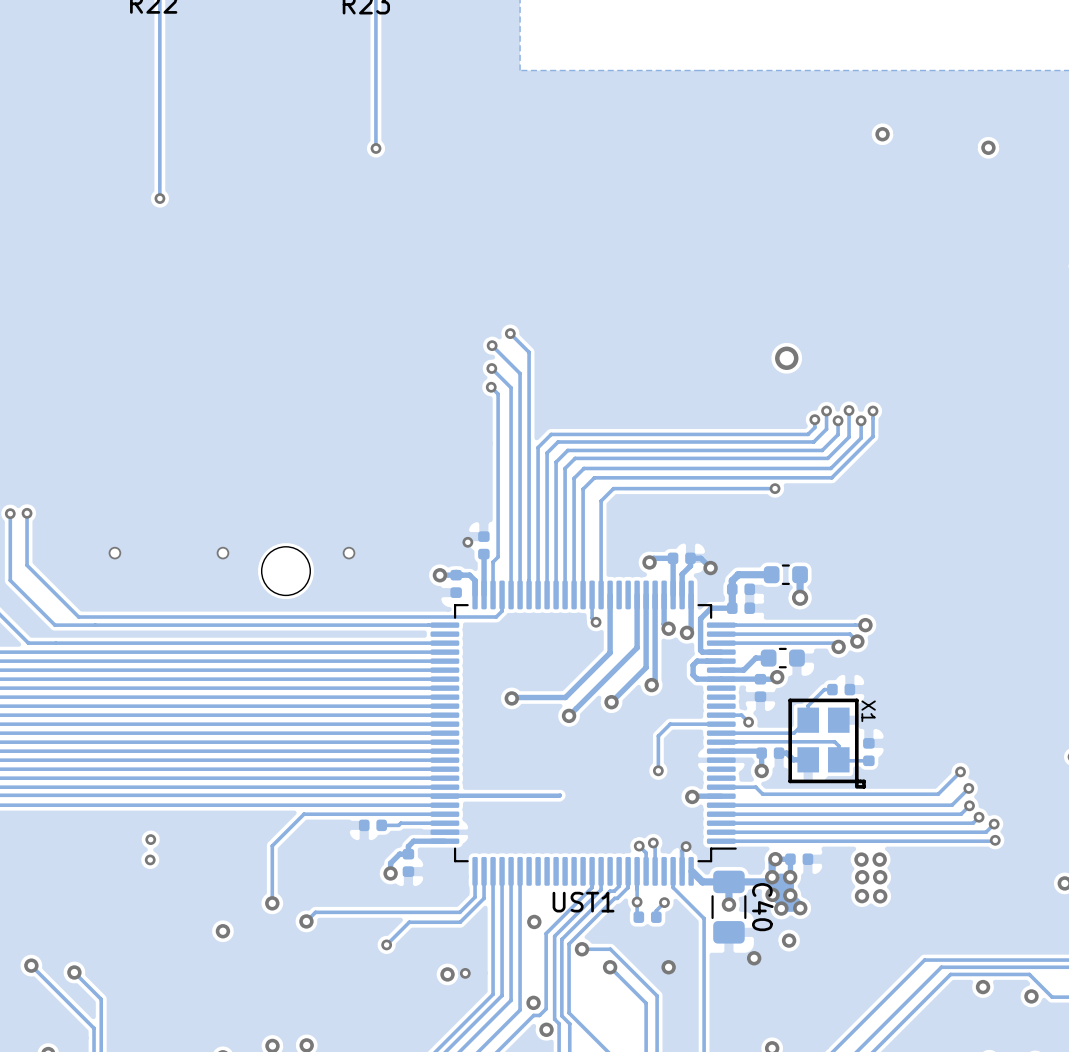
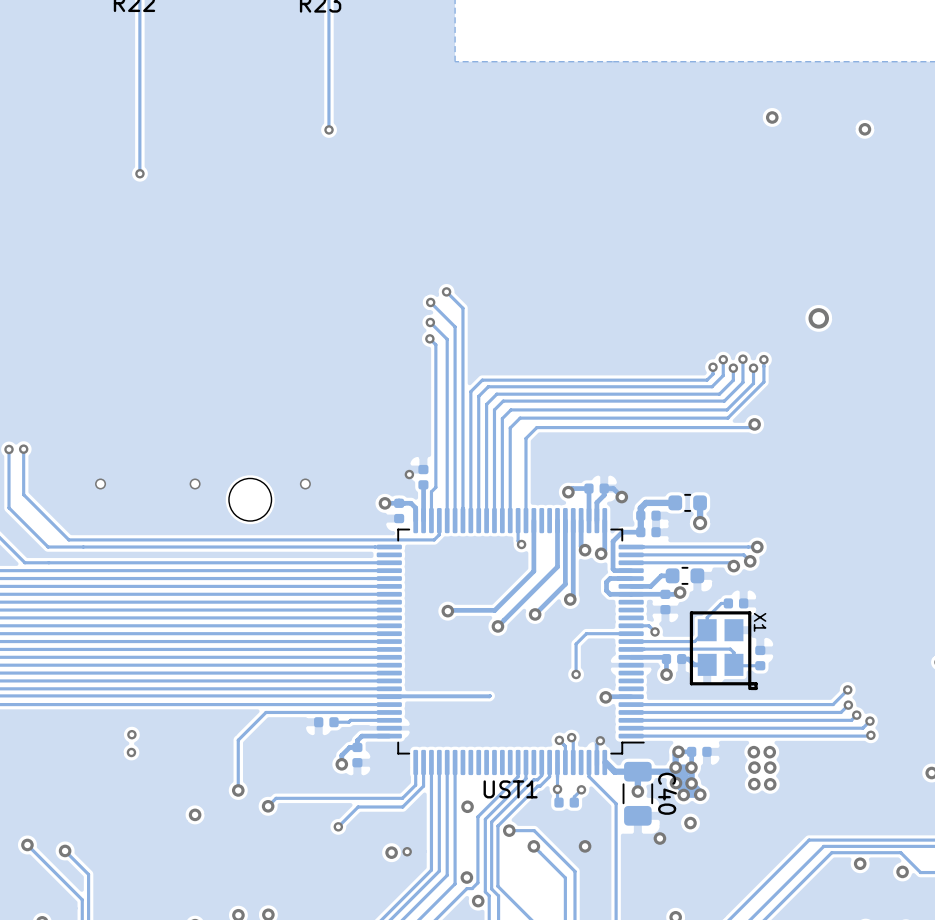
via: (786, 358) -> none
via: none -> (818, 318)
track: none -> (754, 424) (751, 427) (678, 427)
via: none -> (754, 424)
via: (775, 488) -> none
track: (960, 771) (938, 794) (762, 794) (755, 787) (721, 787) -> none
via: (960, 771) -> none

